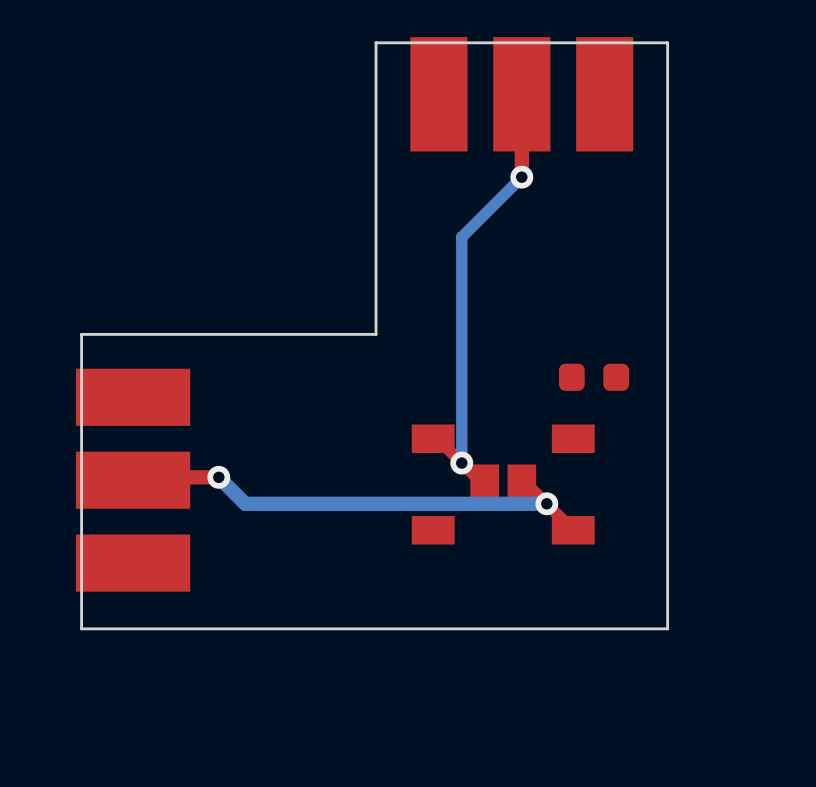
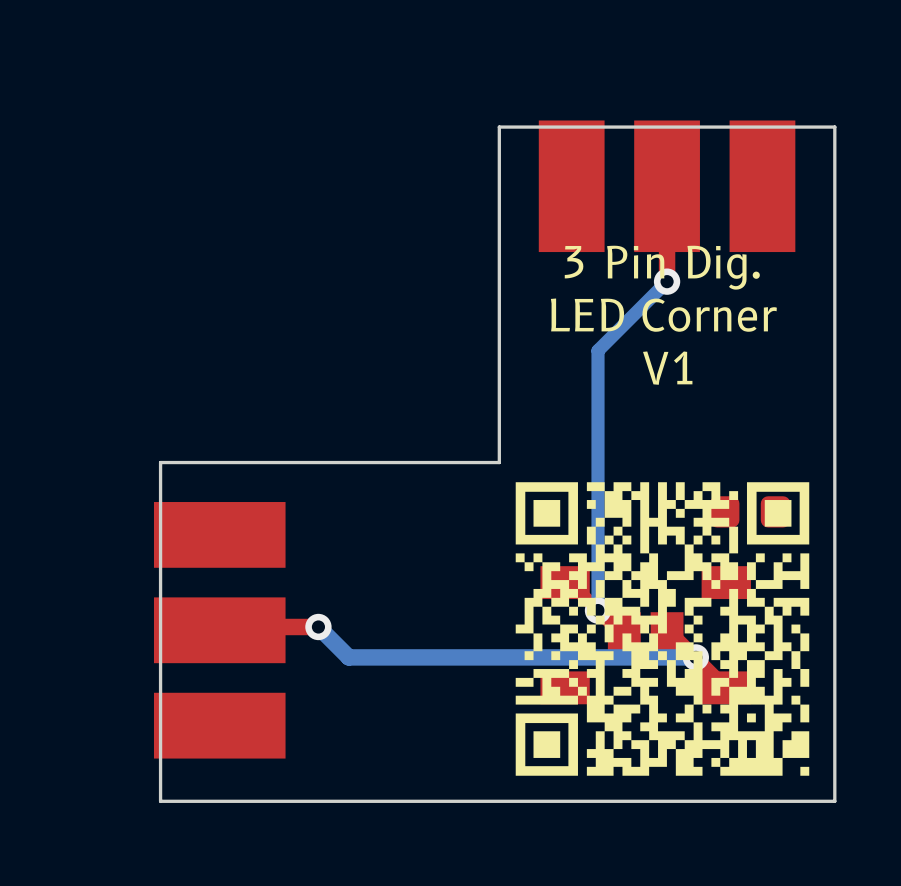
text: none -> 3 Pin Dig. (662, 267)
text: none -> LED Corner (663, 315)
text: none -> V1 (667, 368)
drawing: none -> [515, 482, 810, 776]

